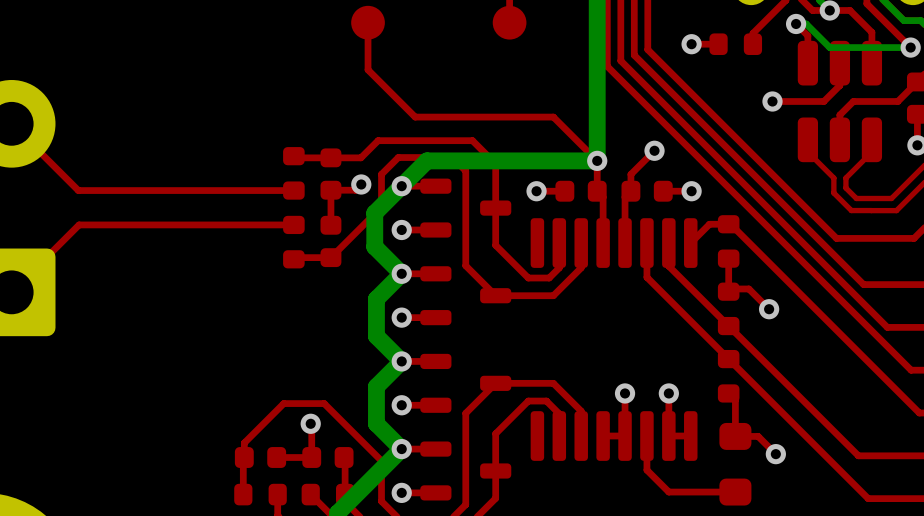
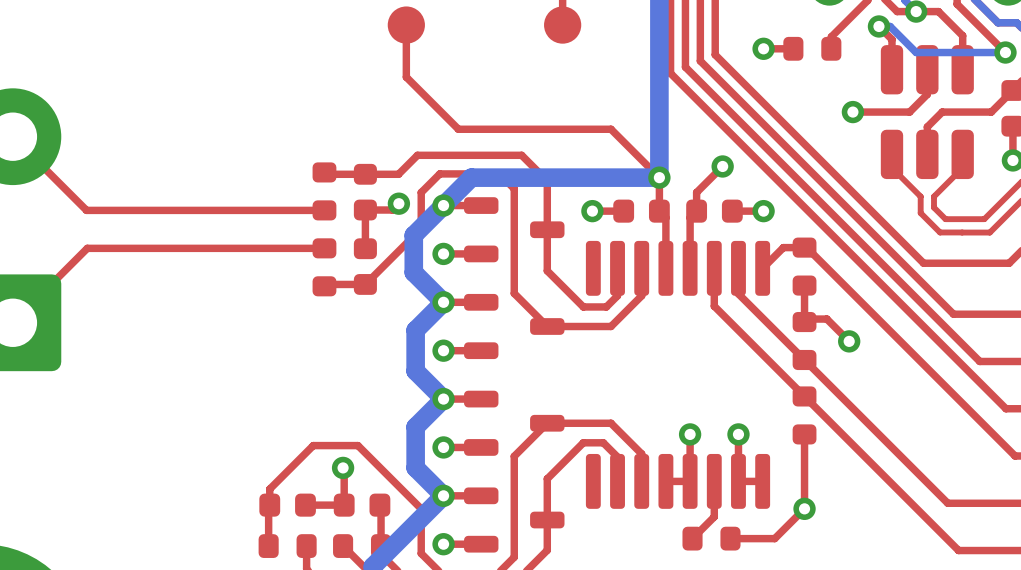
top track: (728, 393) (735, 400) (735, 436) (758, 436) (775, 454) -> (804, 434) (804, 508) (774, 538) (730, 538)
via position: (775, 454) -> (804, 508)
part: (735, 464) -> none
top track: (646, 468) (668, 492) (735, 492) -> (714, 516) (692, 538)
part: none -> (711, 538)

